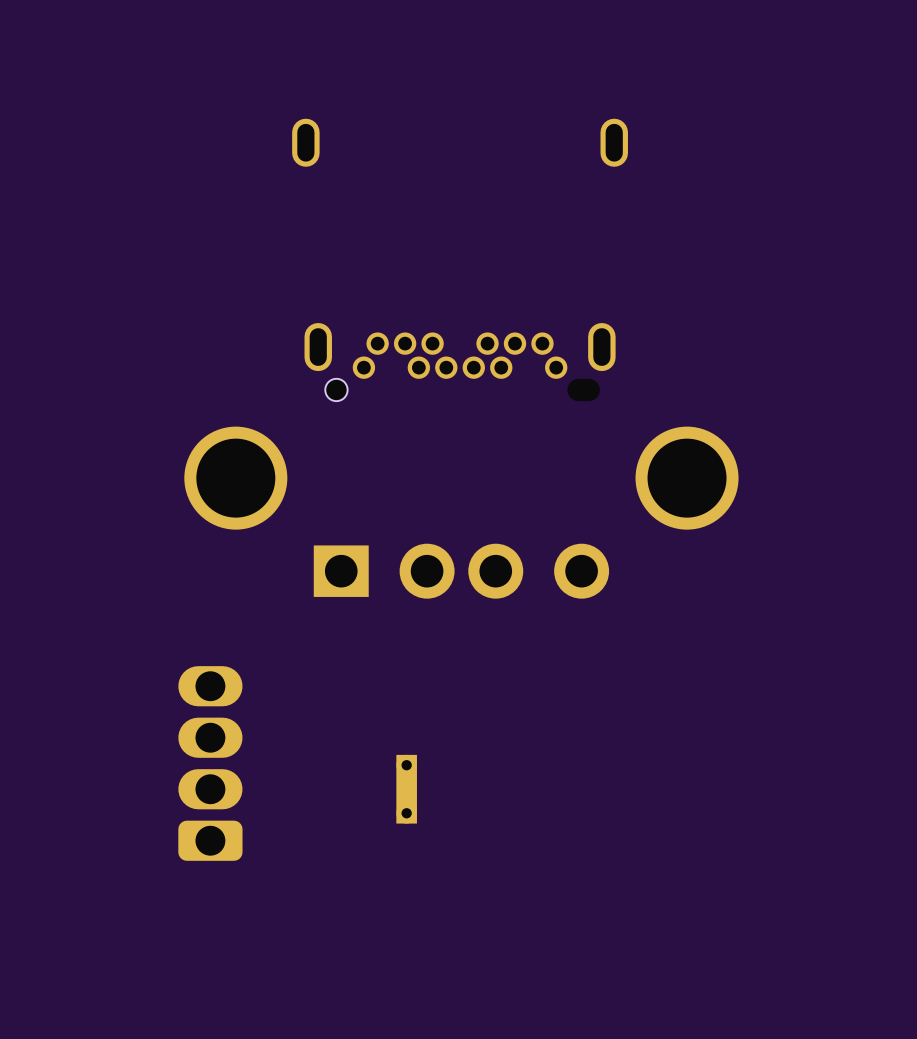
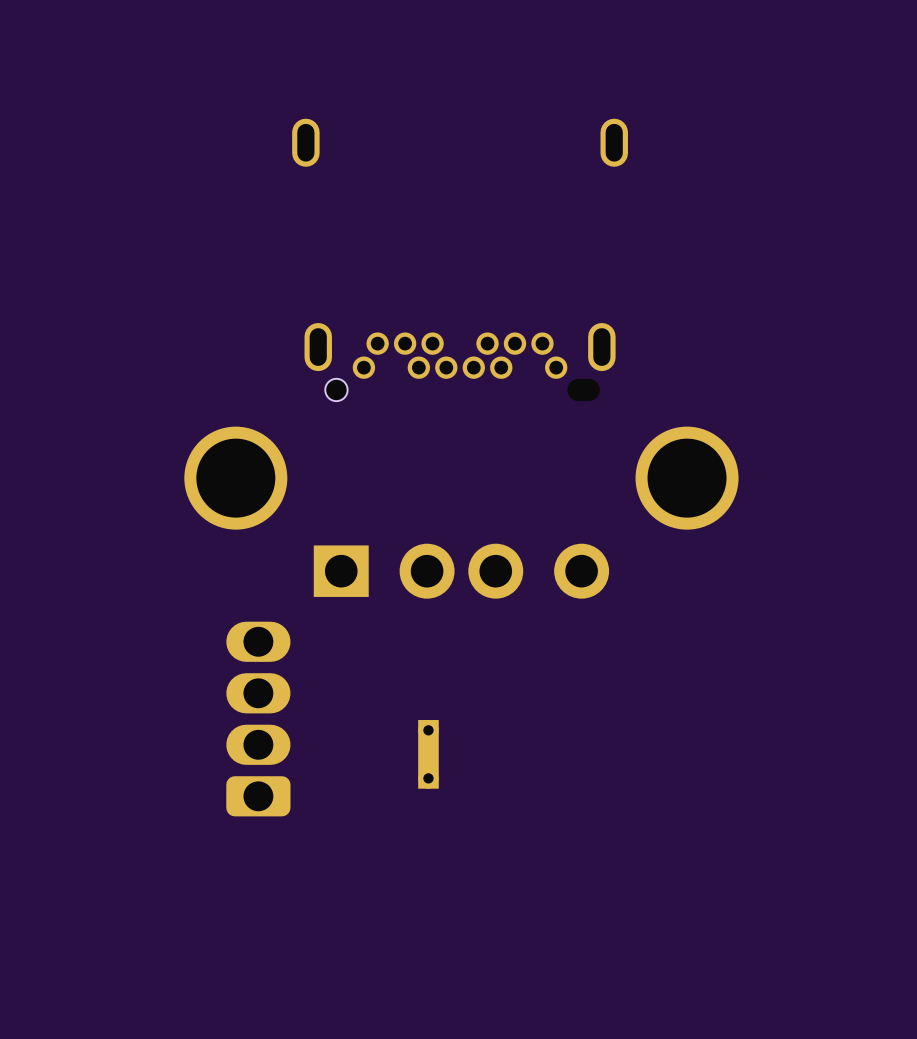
part position: (210, 763) -> (258, 719)
part position: (406, 789) -> (428, 754)

